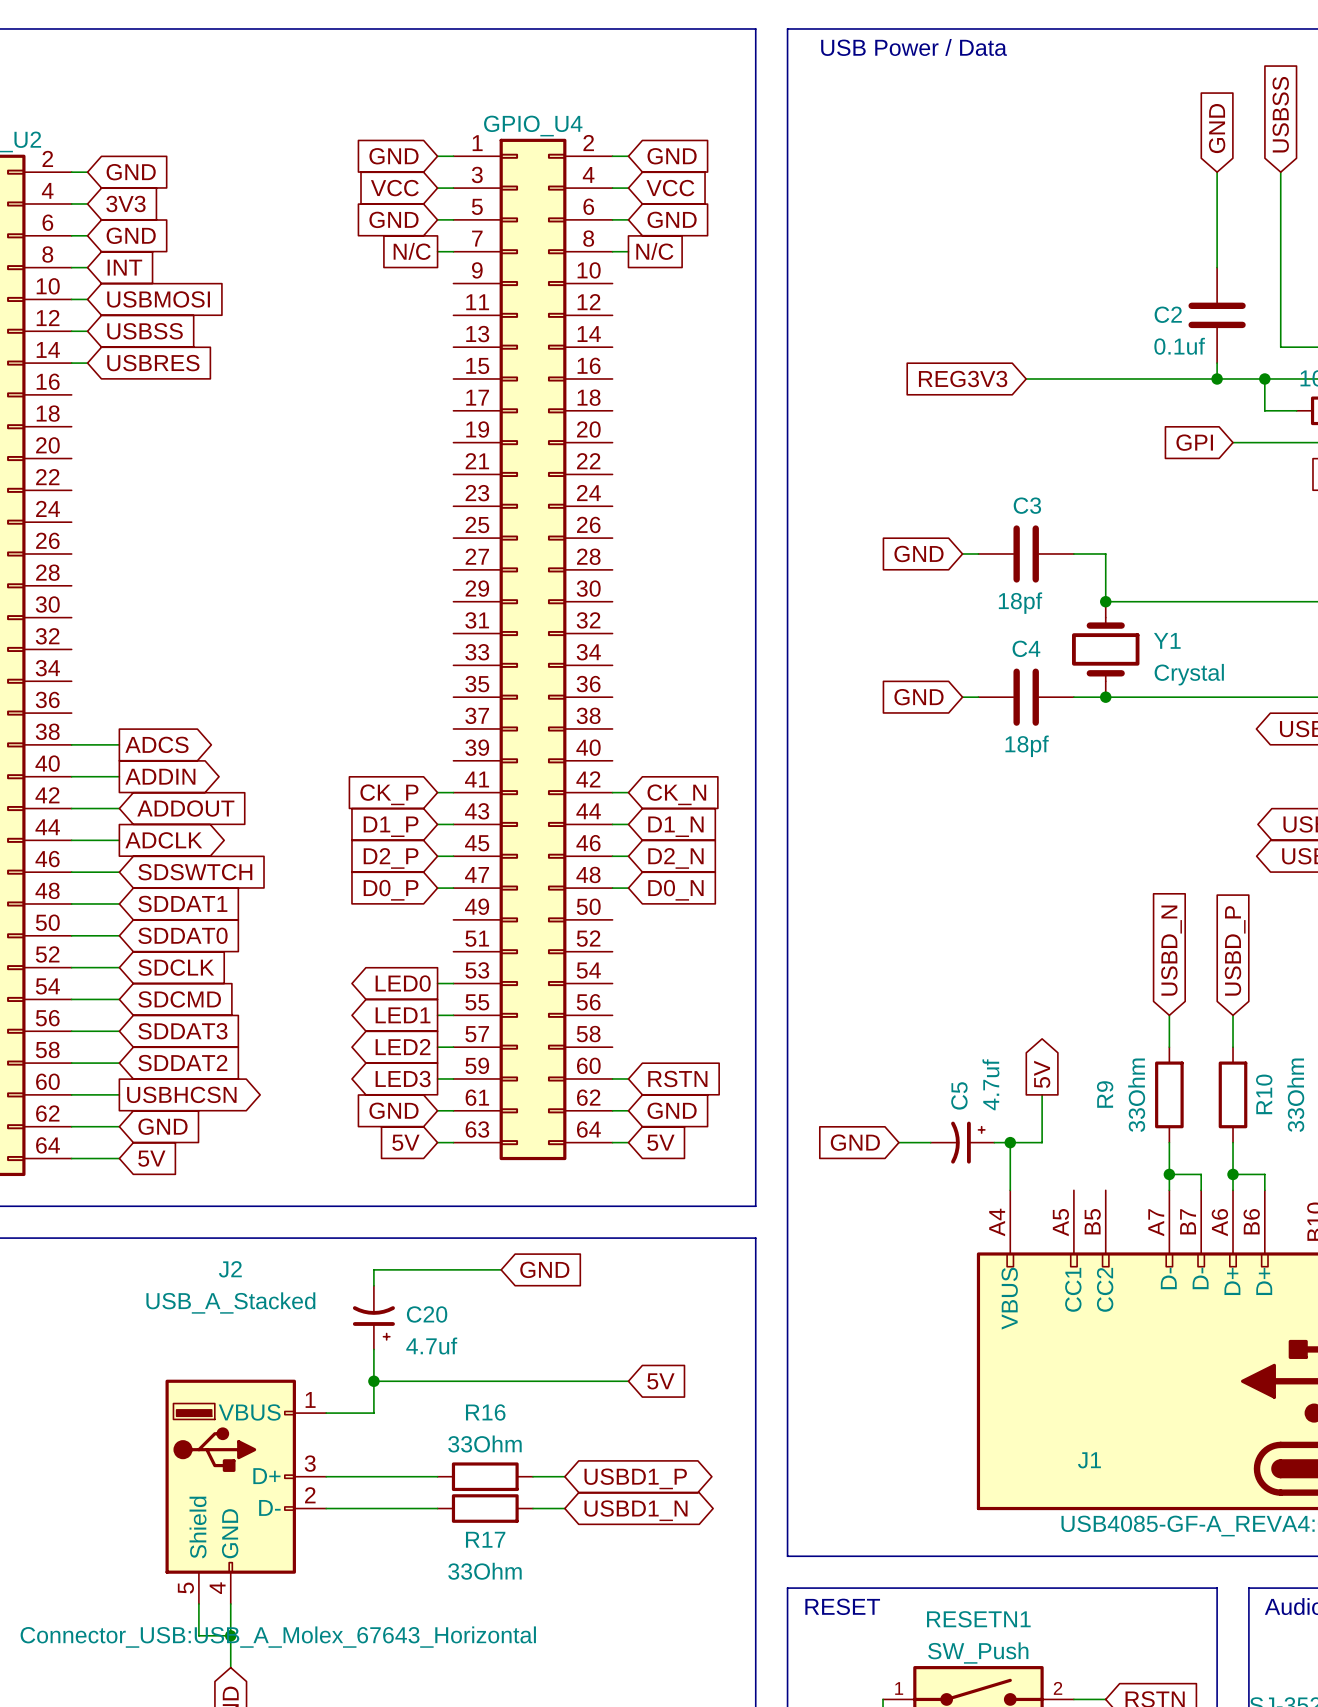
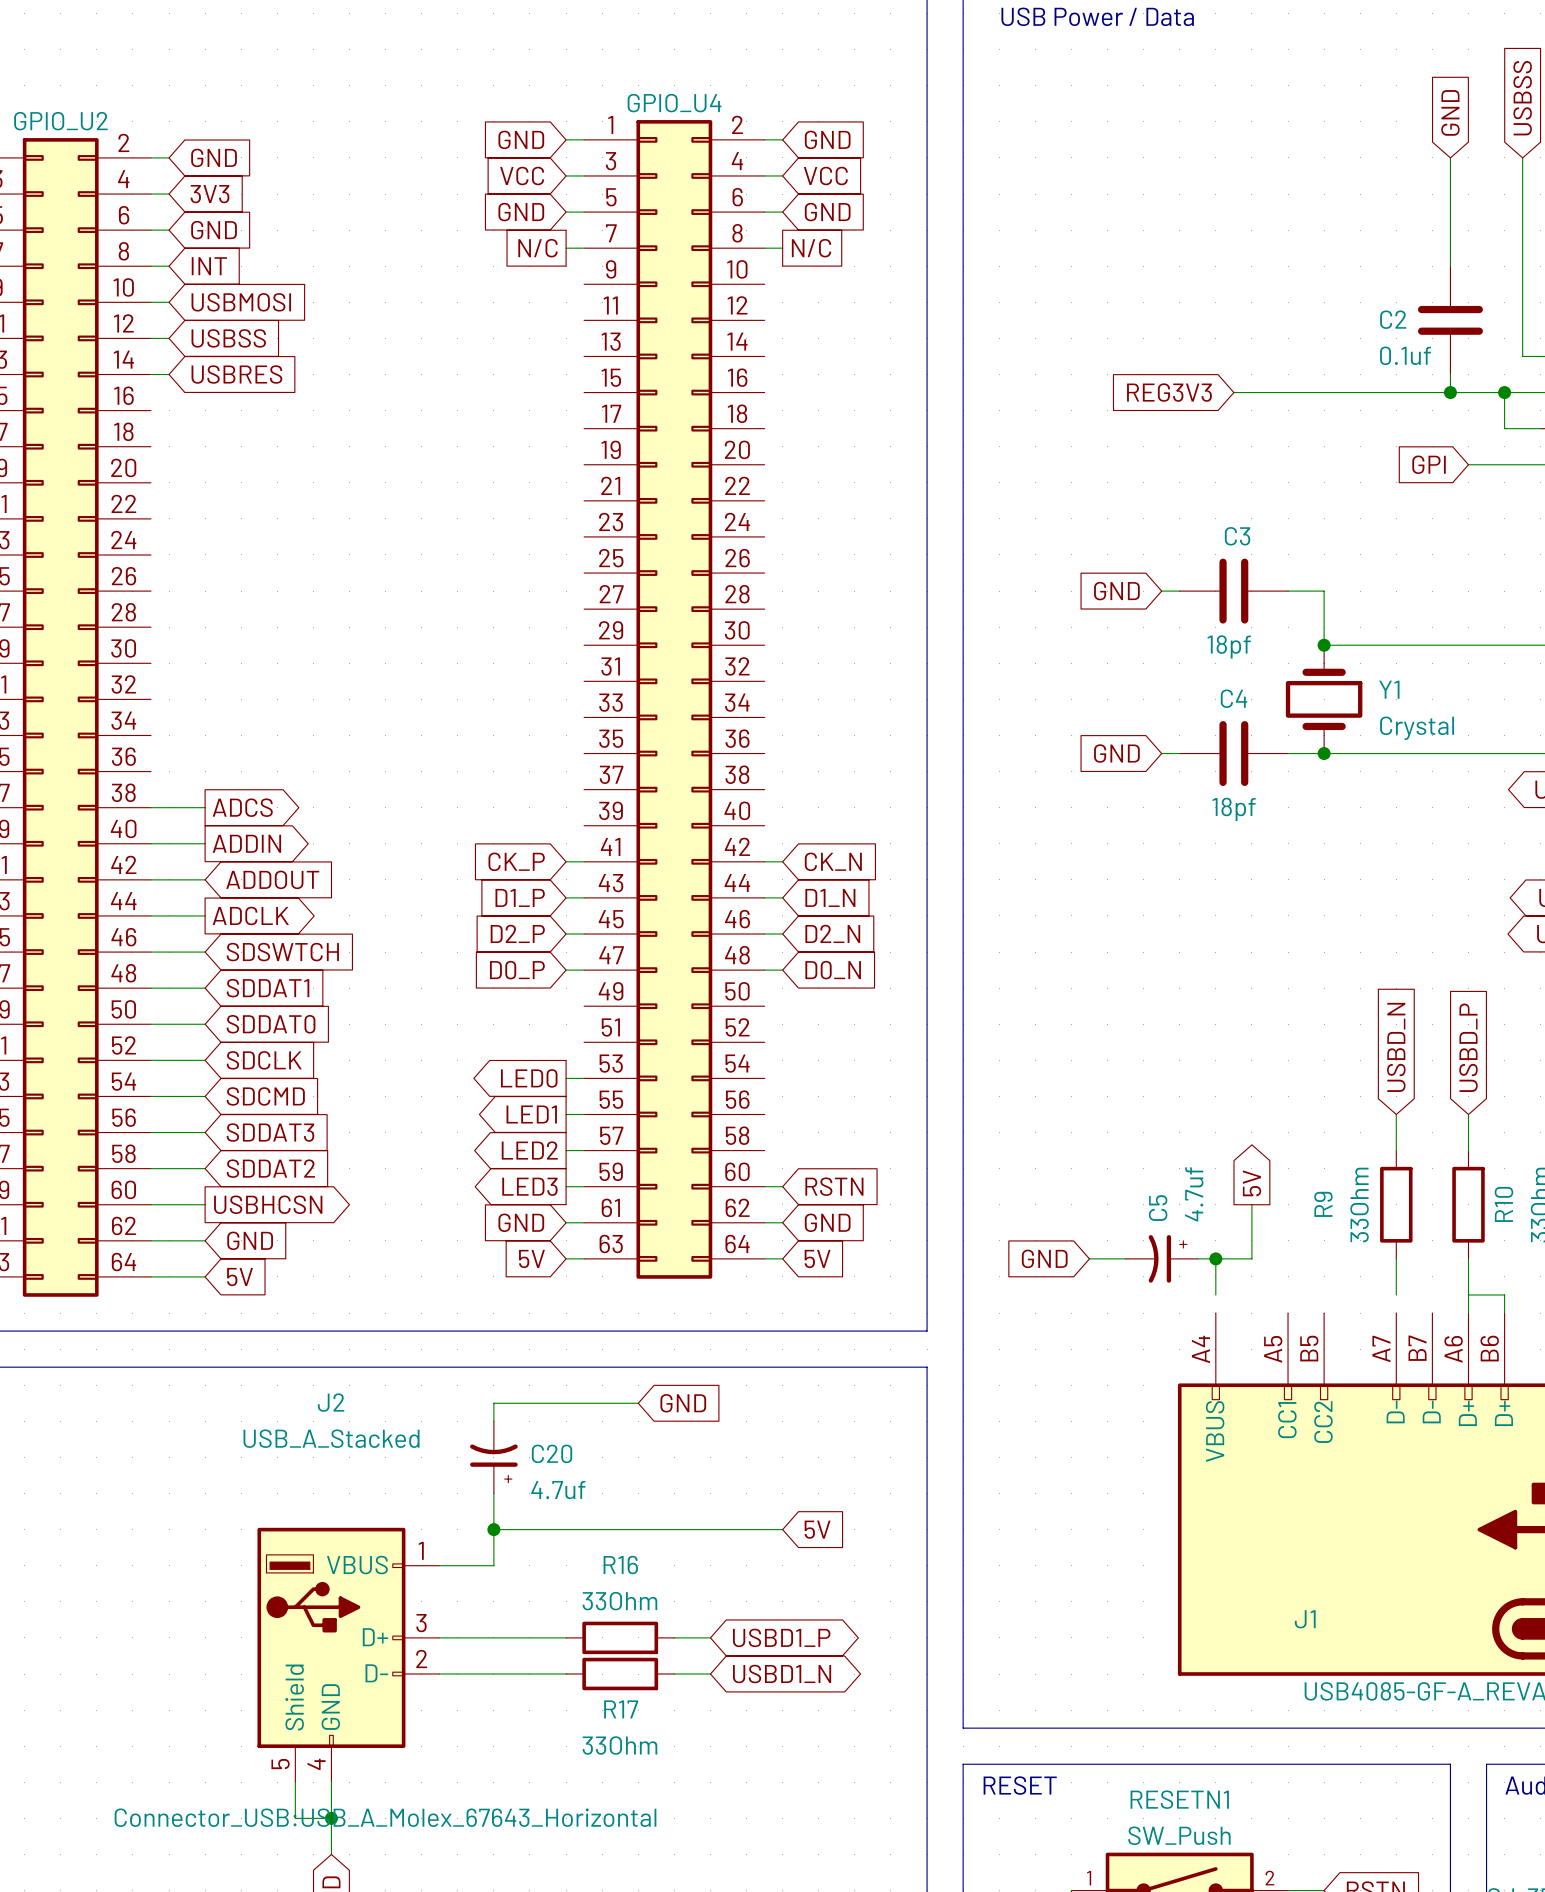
wire: (1010, 1174) (1010, 1190) -> none
junction: (1169, 1174) -> none
junction: (1233, 1174) -> none
wire: (1169, 1190) (1169, 1174) (1201, 1174) (1201, 1190) -> none

